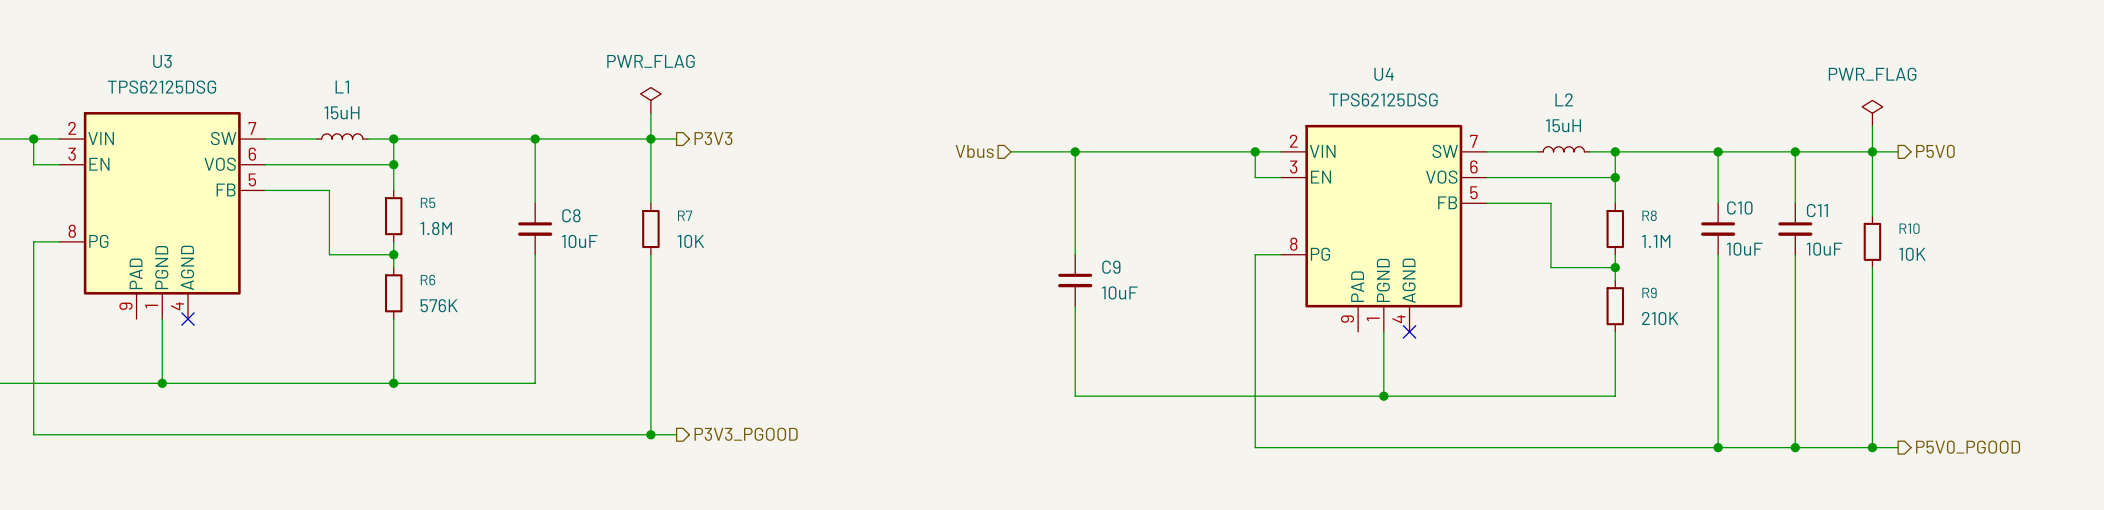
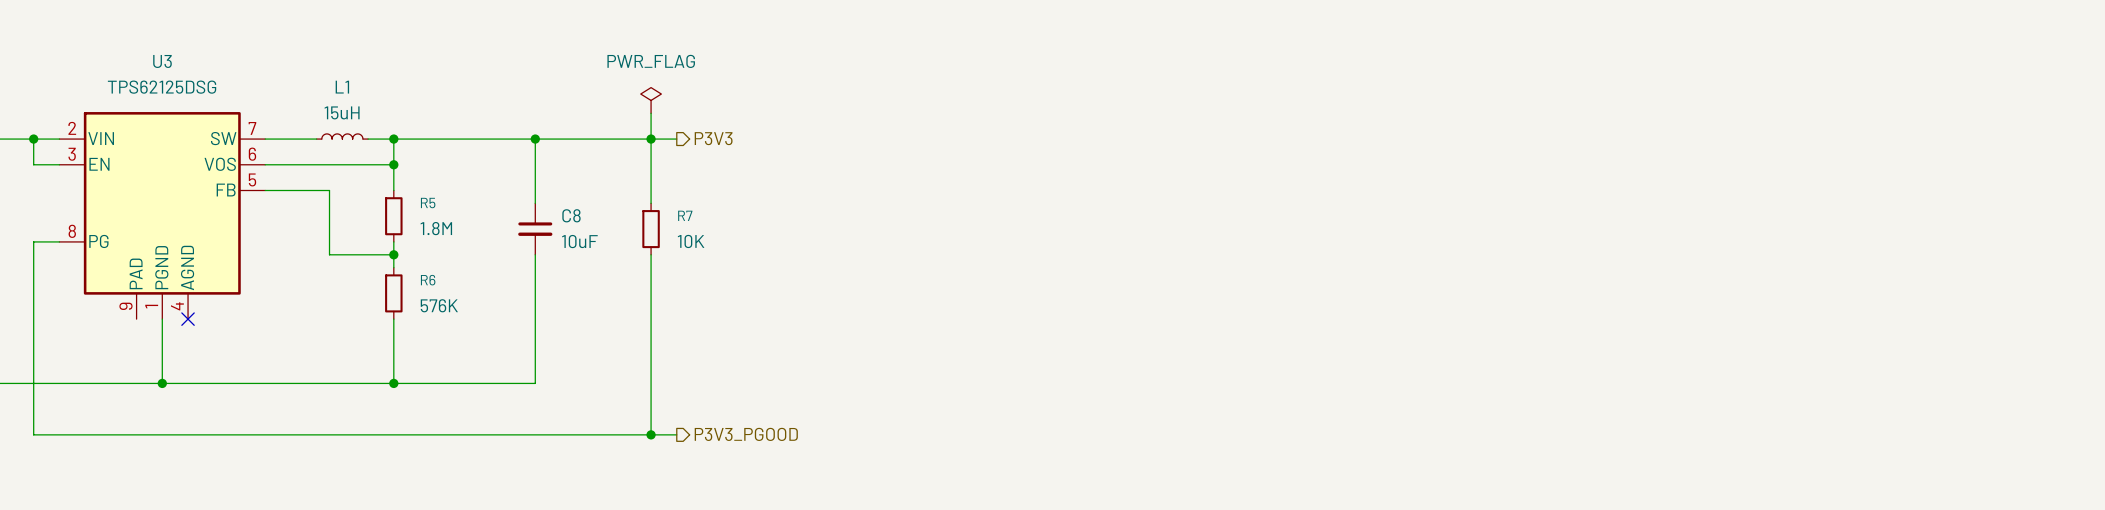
power symbol: PWR_FLAG (1872, 113) -> none
wire: (1872, 126) (1872, 216) -> none
L2: 15uH (1563, 149) -> none
hierarchical label: Vbus (974, 151) -> none
wire: (1010, 151) (1280, 151) -> none
wire: (1075, 151) (1075, 254) -> none
junction: (1075, 151) -> none
wire: (1255, 151) (1255, 177) (1280, 177) -> none
junction: (1255, 151) -> none
wire: (1486, 151) (1538, 151) -> none
wire: (1589, 151) (1898, 151) -> none
wire: (1615, 151) (1615, 203) -> none
junction: (1615, 151) -> none
wire: (1718, 151) (1718, 203) -> none
junction: (1718, 151) -> none
wire: (1795, 151) (1795, 203) -> none
junction: (1795, 151) -> none
junction: (1872, 151) -> none
hierarchical label: P5V0 (1935, 151) -> none
wire: (1486, 177) (1615, 177) -> none
junction: (1615, 177) -> none
wire: (1486, 203) (1550, 203) (1550, 267) (1615, 267) -> none
U4: TPS62125DSG (1383, 228) -> none
R8: 1.1M (1615, 229) -> none
C10: 10uF (1718, 229) -> none
C11: 10uF (1795, 229) -> none
R10: 10K (1872, 241) -> none
wire: (1280, 254) (1255, 254) (1255, 447) (1898, 447) -> none
wire: (1615, 254) (1615, 280) -> none
wire: (1718, 254) (1718, 447) -> none
wire: (1795, 254) (1795, 447) -> none
junction: (1615, 267) -> none
wire: (1872, 267) (1872, 447) -> none
C9: 10uF (1075, 280) -> none
wire: (1075, 306) (1075, 396) (1615, 396) (1615, 331) -> none
R9: 210K (1615, 306) -> none
wire: (1383, 331) (1383, 396) -> none
no-connect mark: (1409, 331) -> none
junction: (1383, 396) -> none
junction: (1718, 447) -> none
junction: (1795, 447) -> none
junction: (1872, 447) -> none
hierarchical label: P5V0_PGOOD (1968, 447) -> none

